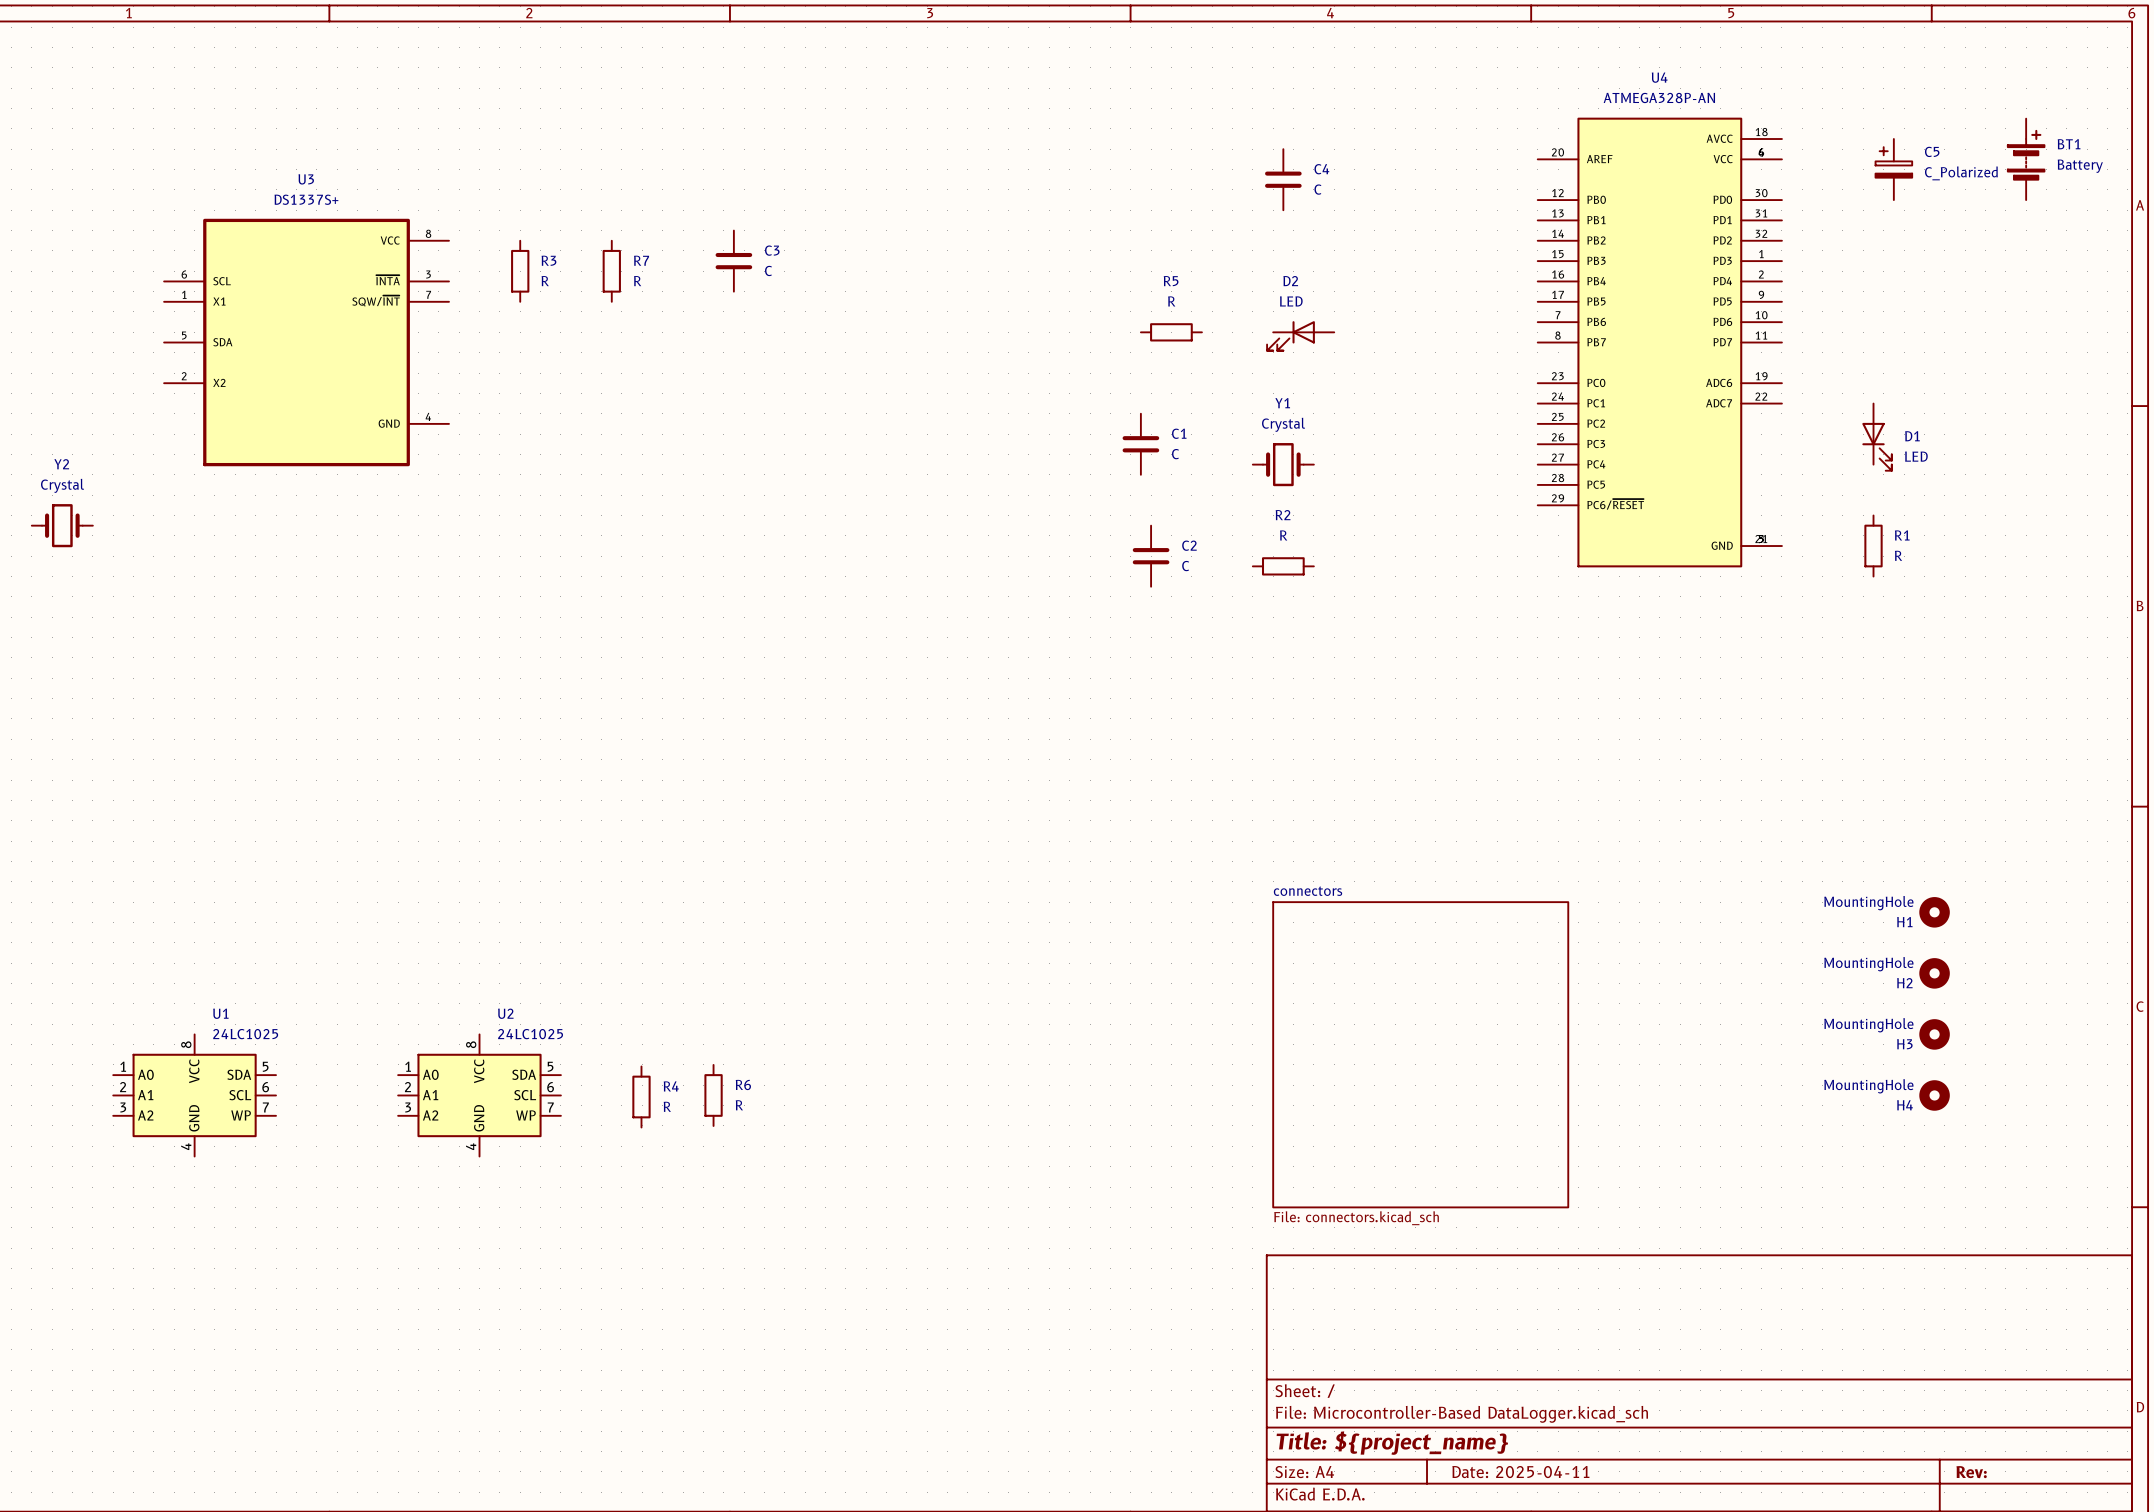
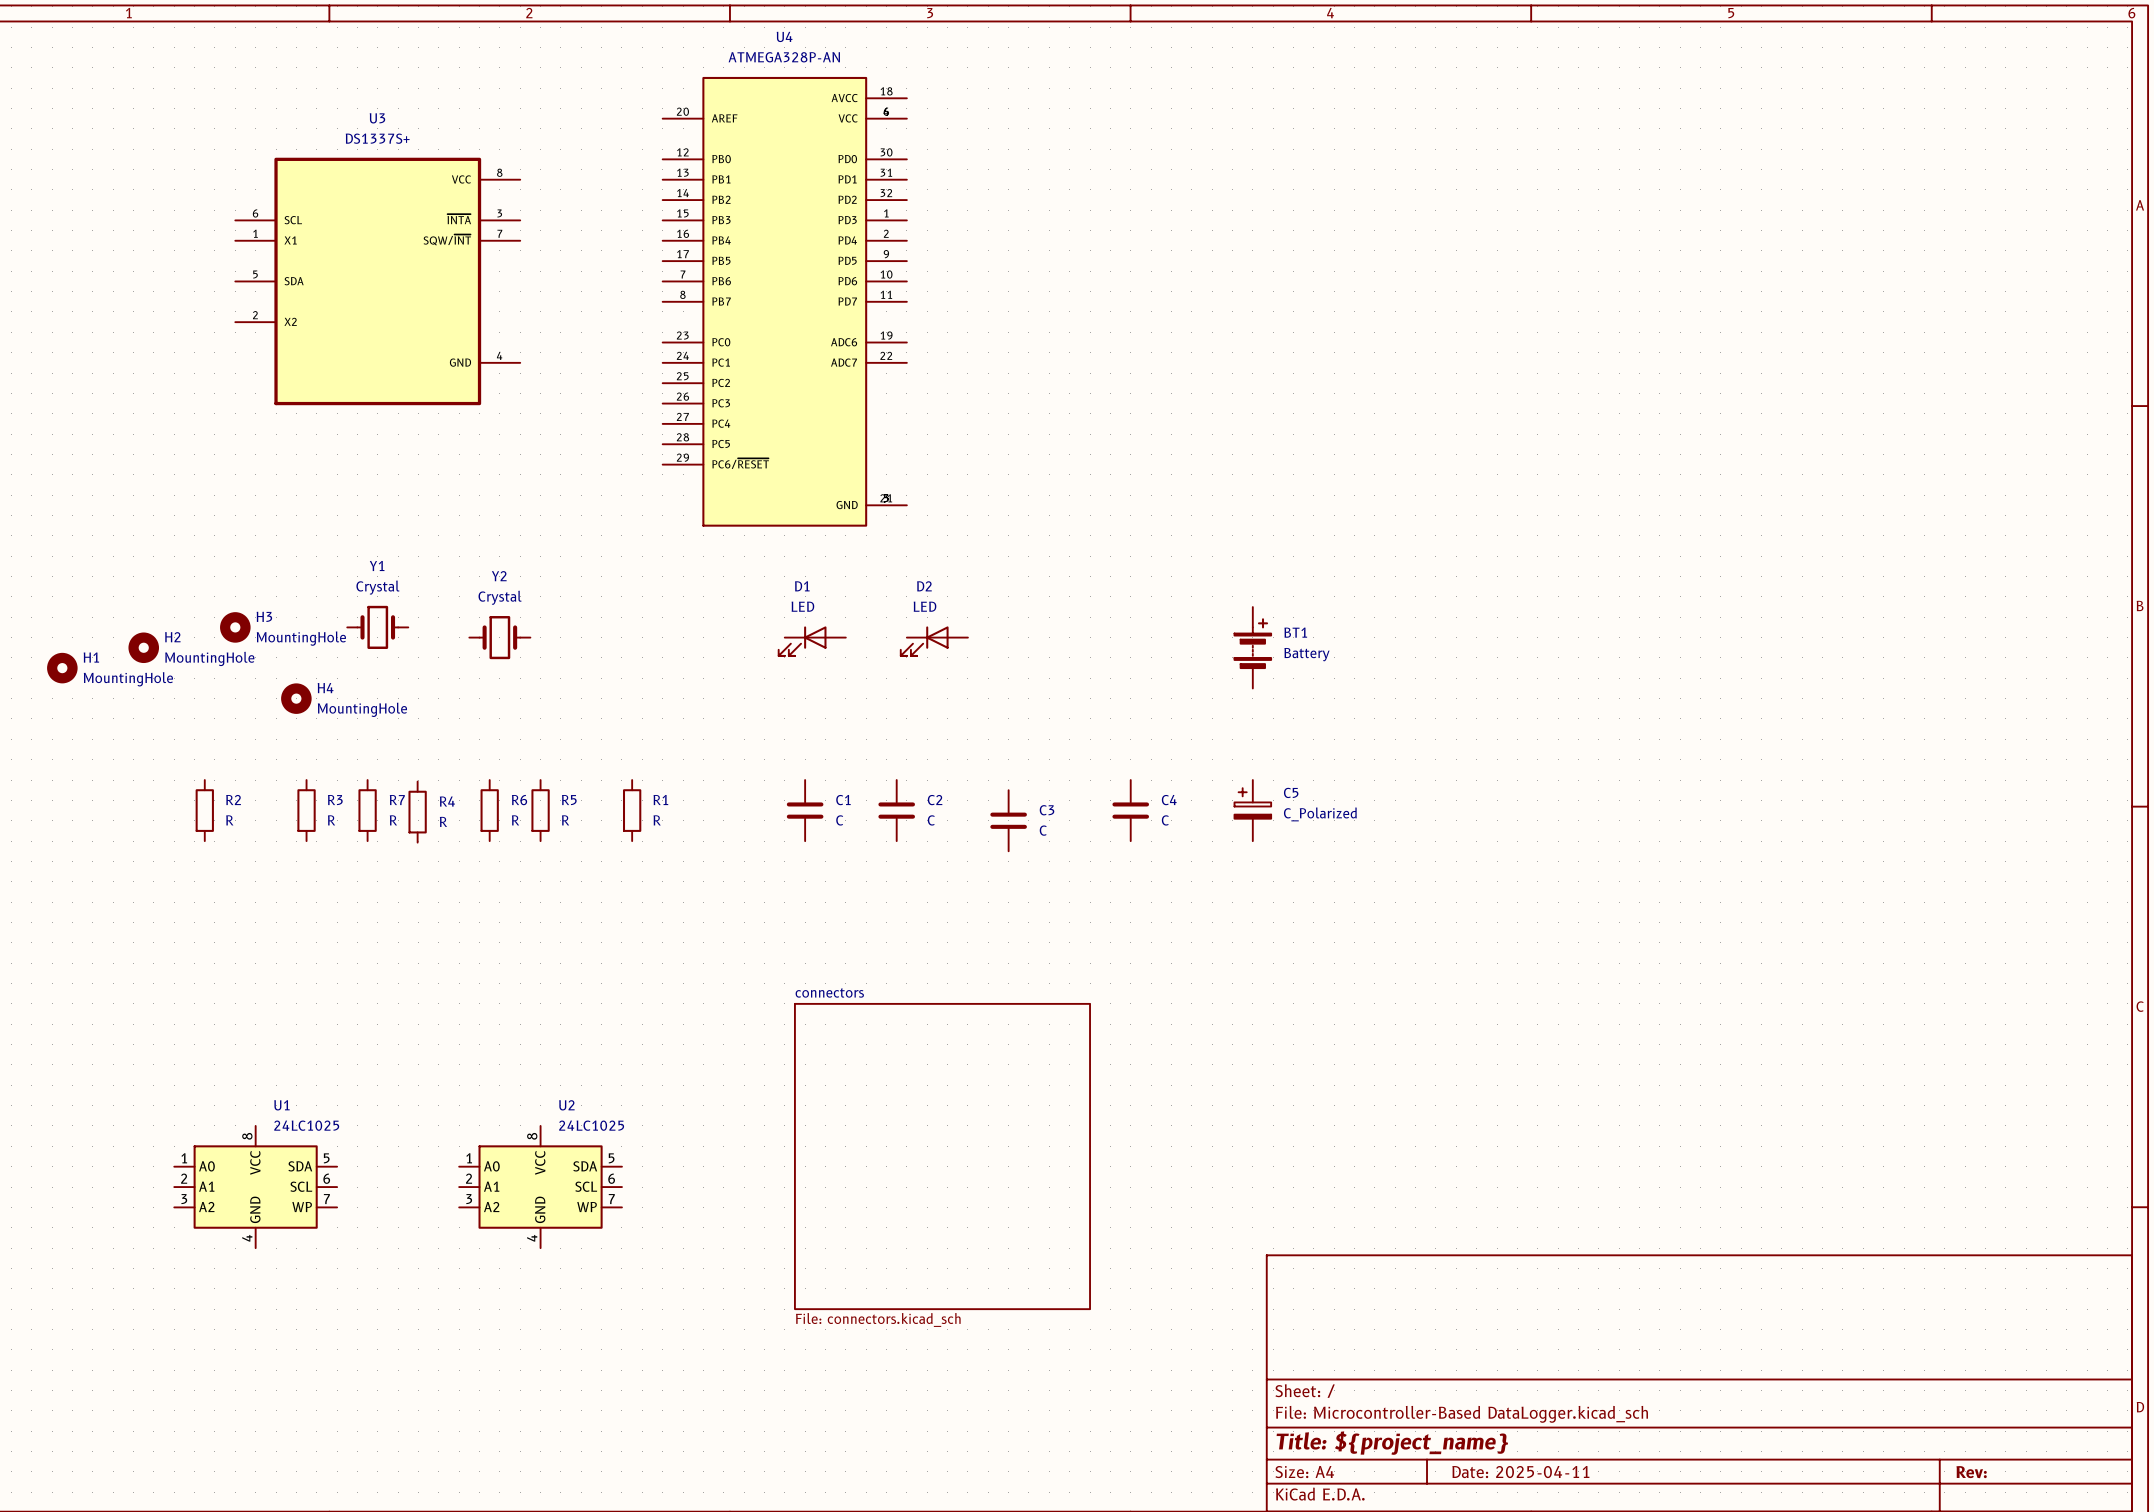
BT1 position: (2026, 159) -> (1252, 647)
C5 position: (1893, 169) -> (1252, 810)
C4 position: (1283, 179) -> (1130, 810)
C3 position: (733, 261) -> (1008, 820)
R3 position: (520, 271) -> (306, 810)
R7 position: (611, 271) -> (367, 810)
R5 name position: R5 (1171, 281) -> R5 (569, 800)
R5 rotation: 0° (1171, 332) -> 90° clockwise (540, 810)
R5 position: (1171, 332) -> (540, 810)
D2 position: (1300, 335) -> (934, 641)
U3 position: (306, 342) -> (377, 281)
U4 position: (1659, 342) -> (784, 301)
D1 name position: D1 (1912, 436) -> D1 (802, 586)
D1 position: (1877, 437) -> (812, 641)
C1 position: (1140, 444) -> (805, 810)
D1 rotation: 0° (1877, 446) -> 90° clockwise (802, 641)
D1 value position: LED (1916, 456) -> LED (802, 606)
Y1 position: (1283, 464) -> (377, 627)
R2 name position: R2 (1283, 515) -> R2 (233, 800)
Y2 position: (62, 525) -> (499, 637)
R1 position: (1873, 546) -> (632, 810)
C2 position: (1151, 556) -> (896, 810)
R2 rotation: 0° (1283, 566) -> 90° clockwise (204, 810)
R2 position: (1283, 566) -> (204, 810)
H1 value position: MountingHole (1868, 903) -> MountingHole (128, 679)
H1 position: (1934, 912) -> (62, 668)
H1 name position: H1 (1904, 922) -> H1 (91, 657)
H2 value position: MountingHole (1868, 964) -> MountingHole (209, 658)
H2 position: (1934, 973) -> (143, 647)
H2 name position: H2 (1904, 983) -> H2 (172, 637)
H3 value position: MountingHole (1868, 1025) -> MountingHole (301, 638)
H3 position: (1934, 1034) -> (235, 627)
H3 name position: H3 (1904, 1044) -> H3 (264, 616)
sheet connectors: File: connectors.kicad_sch (1420, 1054) -> none
H4 value position: MountingHole (1868, 1086) -> MountingHole (362, 709)
U1 position: (194, 1095) -> (255, 1187)
U2 position: (479, 1095) -> (540, 1187)
R6 position: (713, 1095) -> (489, 810)
H4 position: (1934, 1095) -> (296, 698)
R4 position: (641, 1096) -> (417, 812)
H4 name position: H4 (1905, 1105) -> H4 (325, 688)
sheet connectors: none -> File: connectors.kicad_sch (942, 1156)

